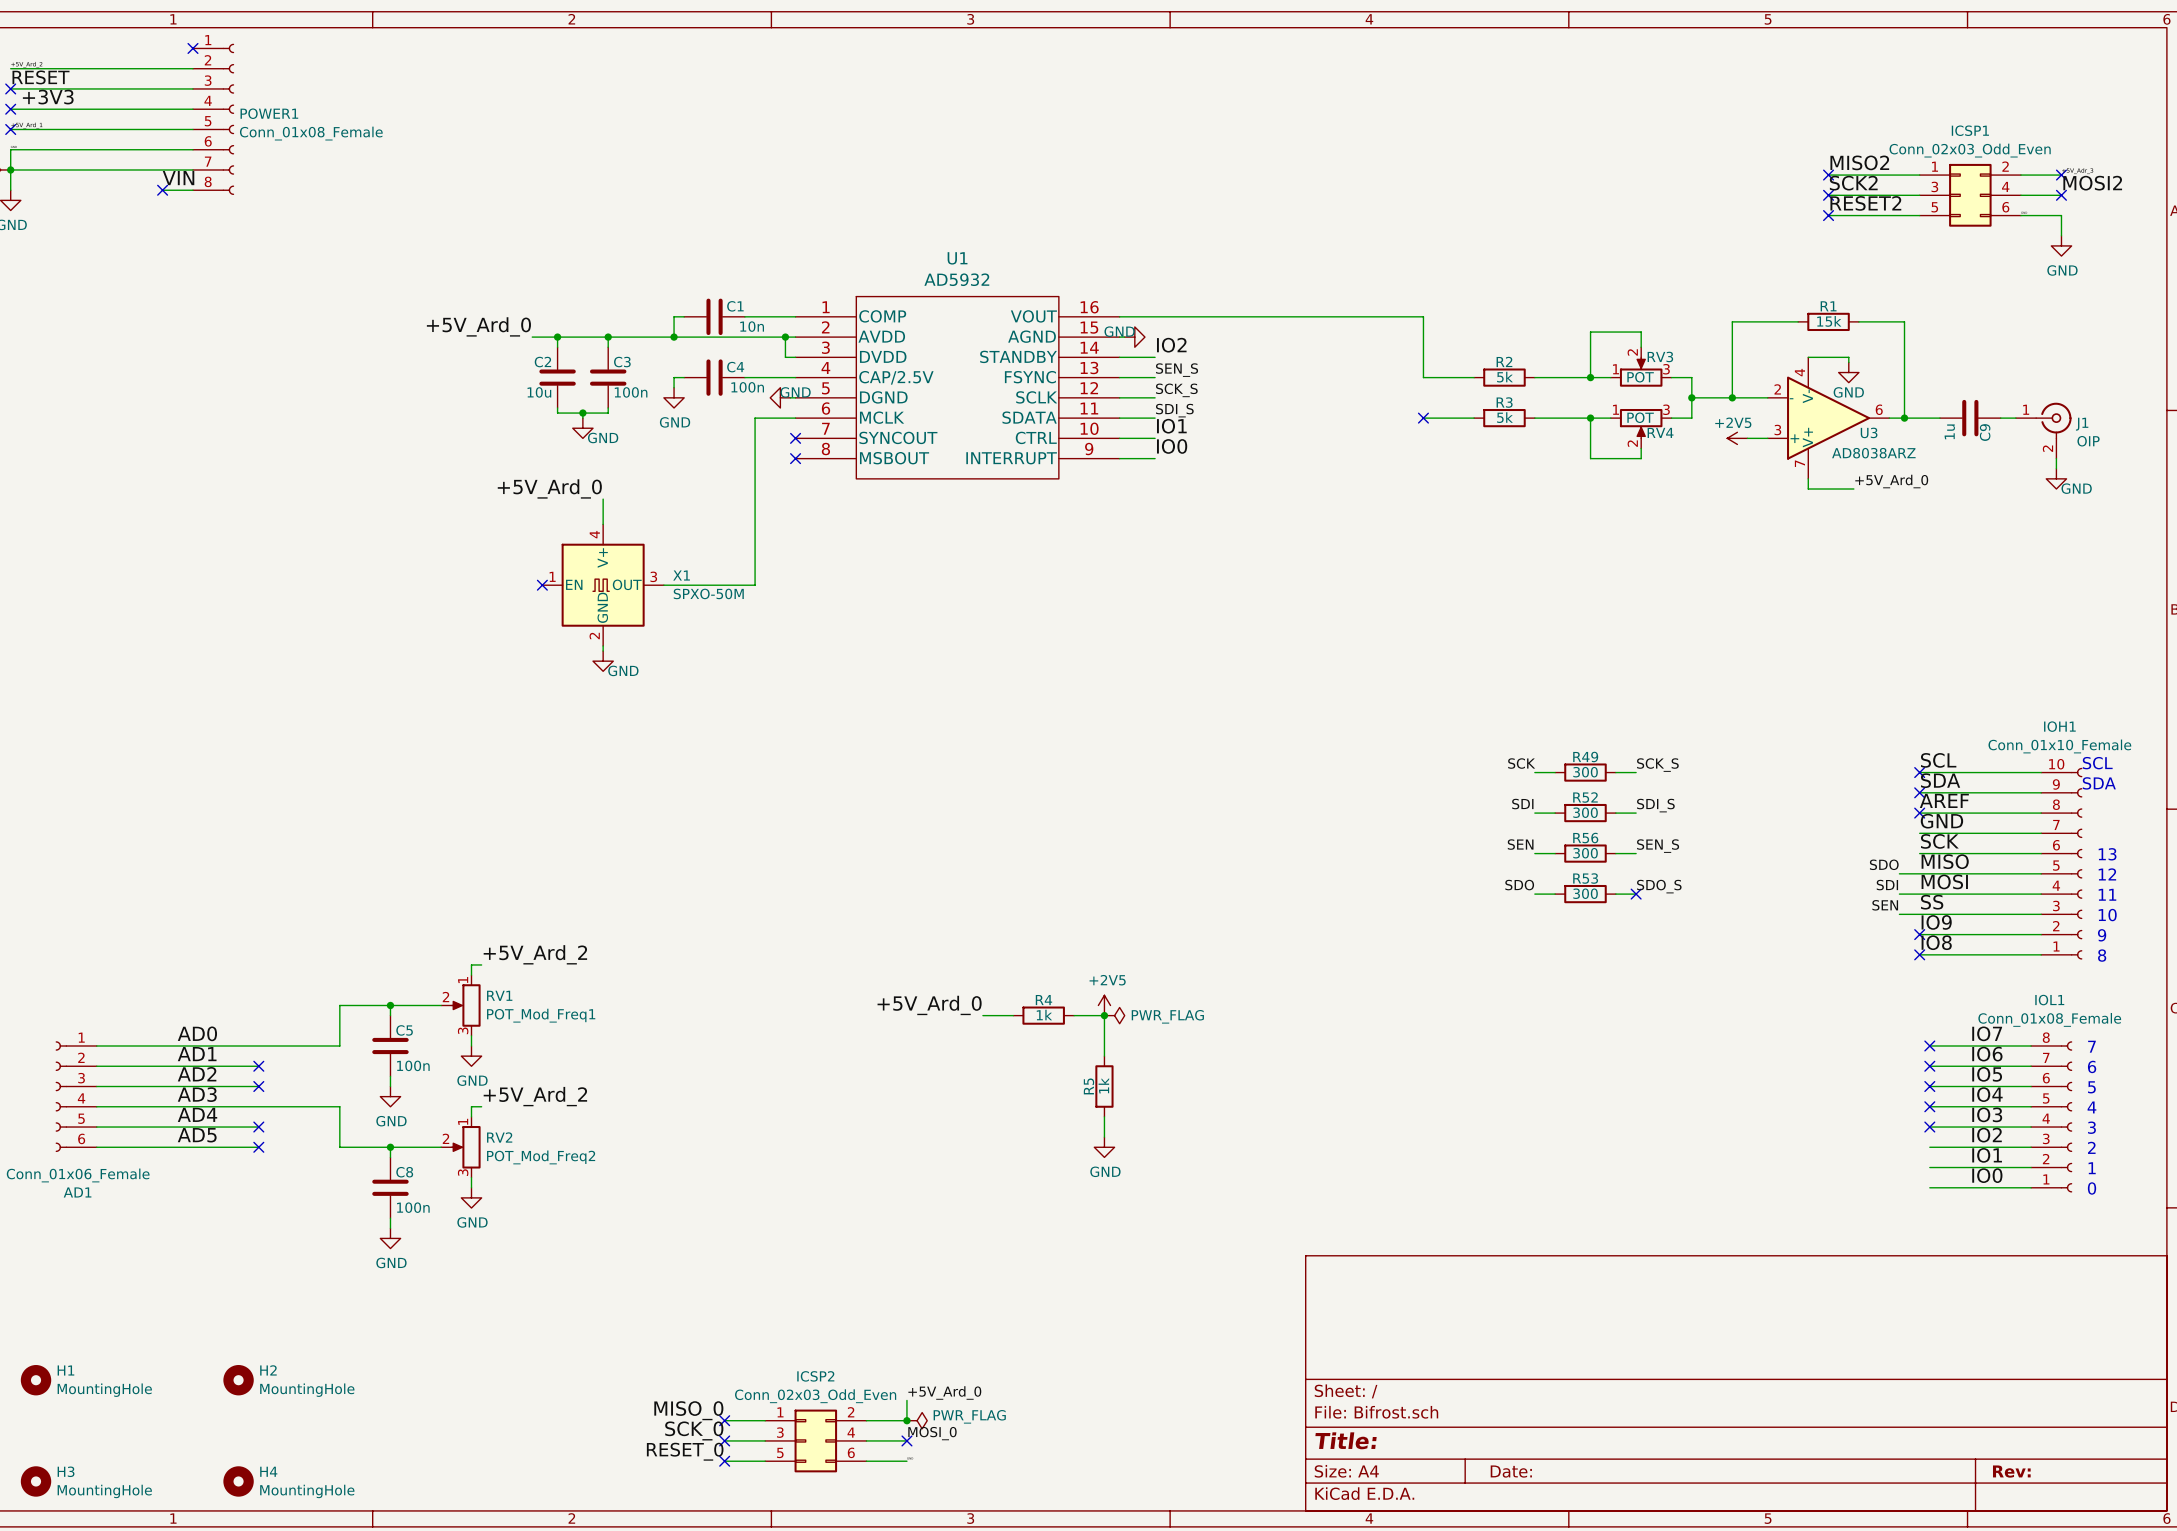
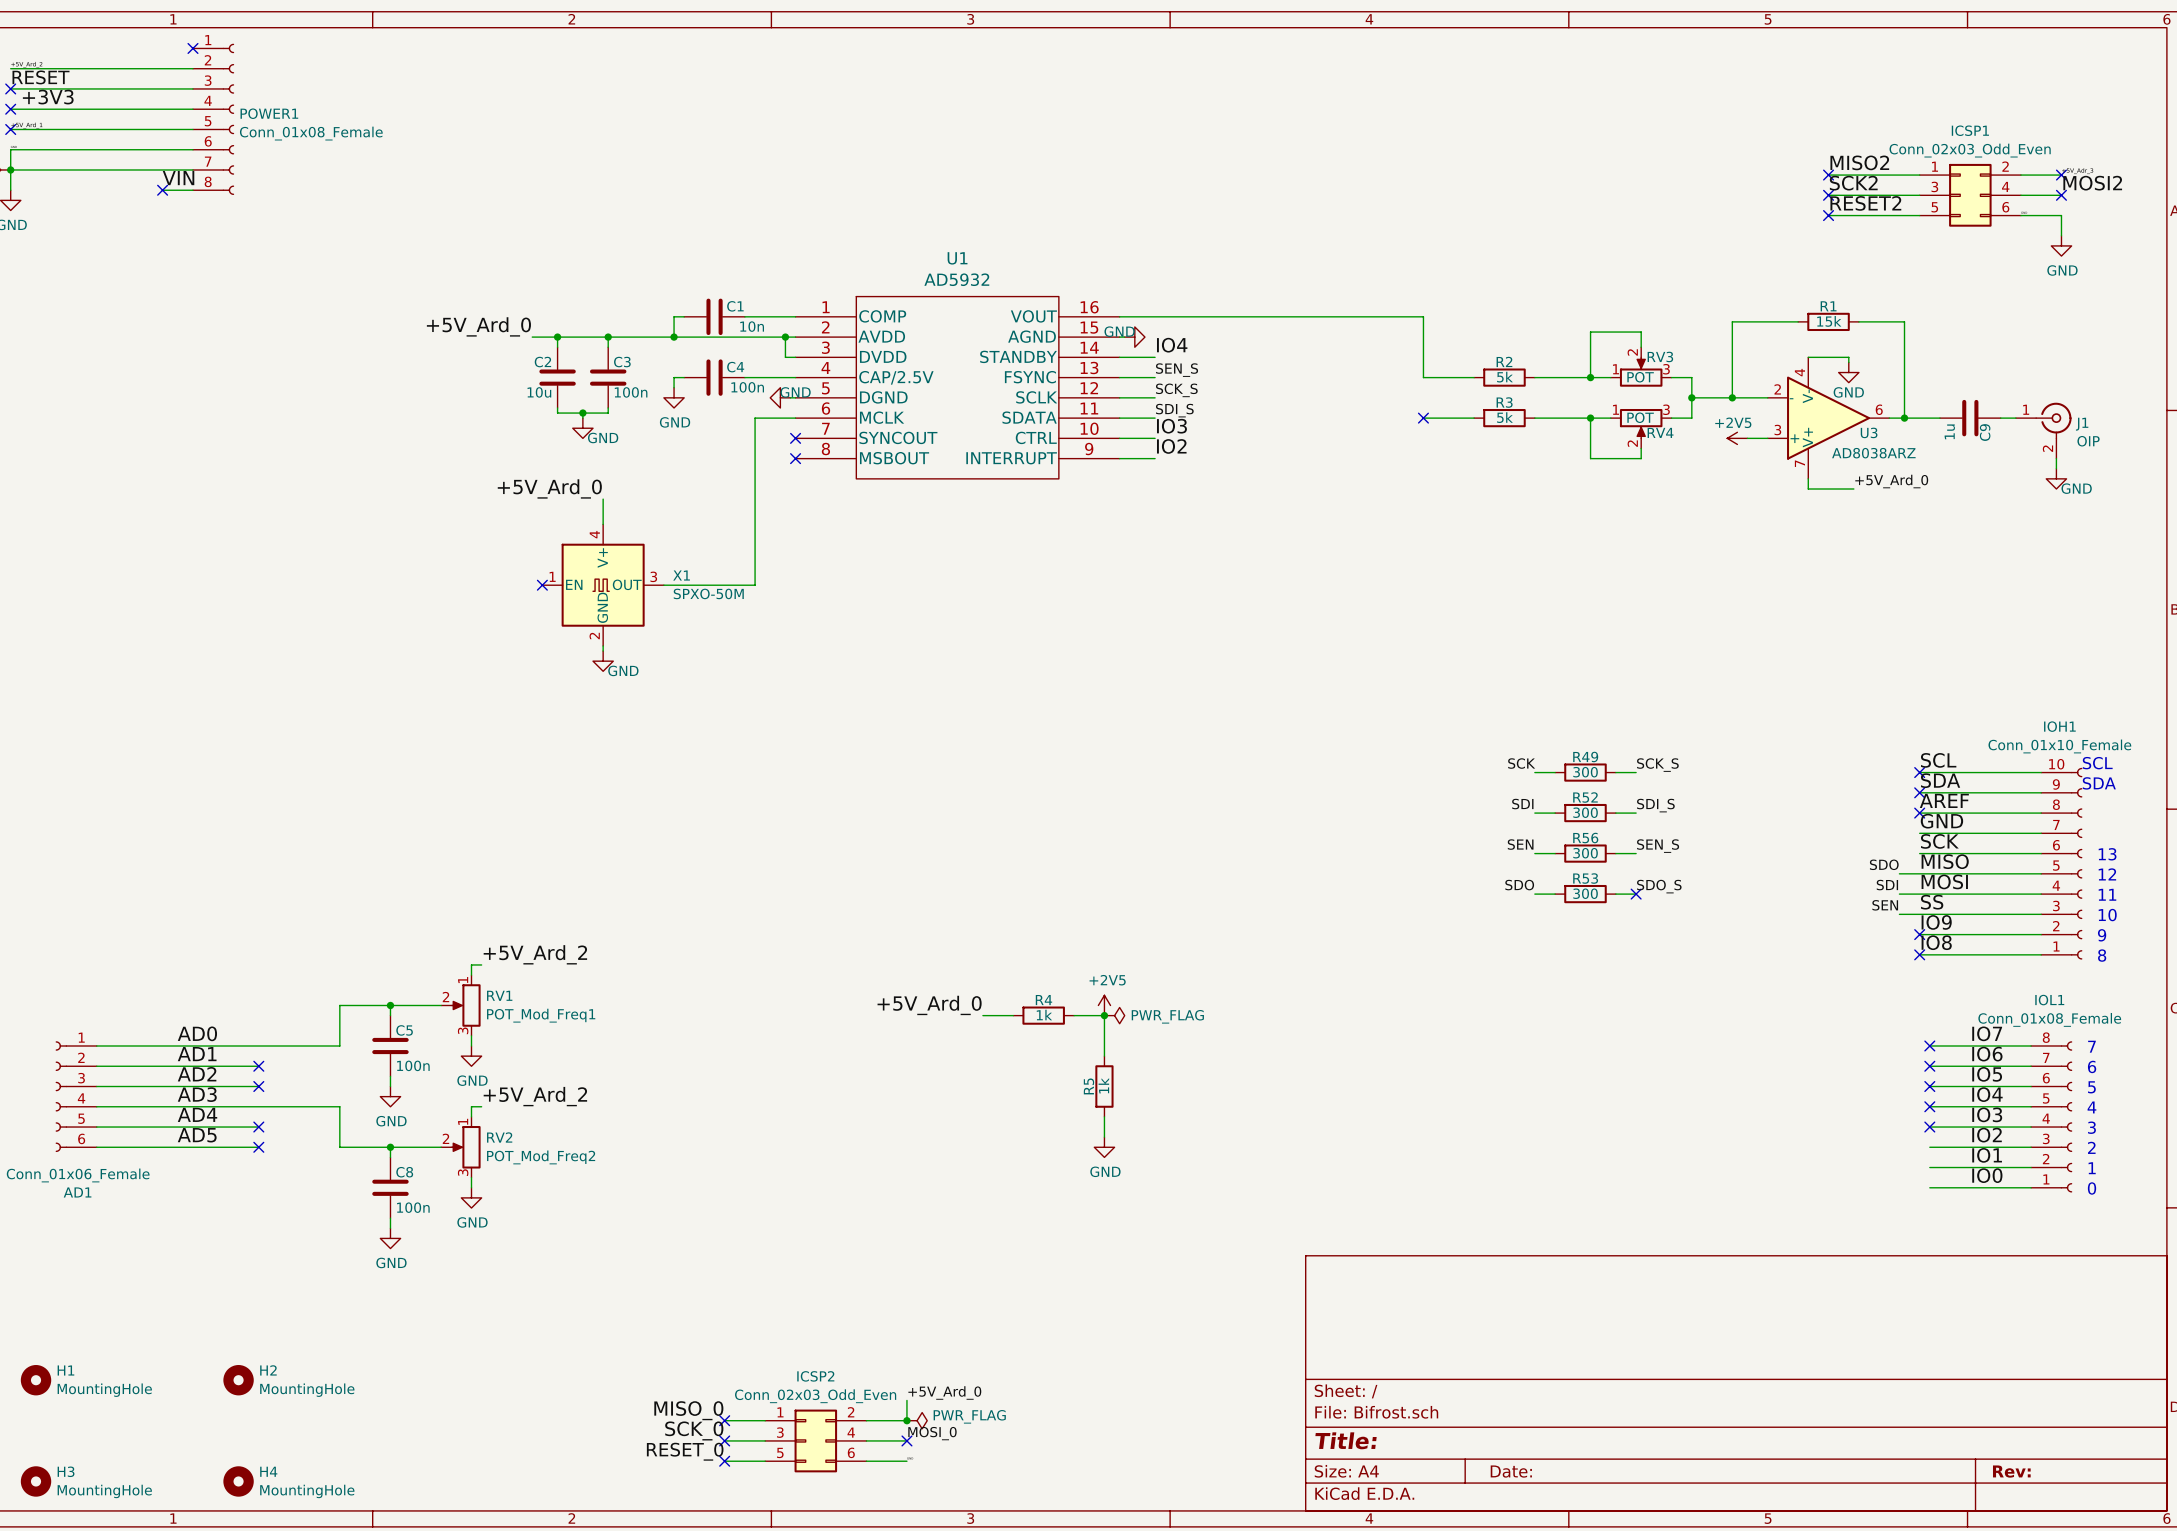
label: IO2 (1171, 345) -> IO4 (1172, 345)
label: IO1 (1171, 426) -> IO3 (1171, 426)
label: IO0 (1172, 446) -> IO2 (1171, 446)

